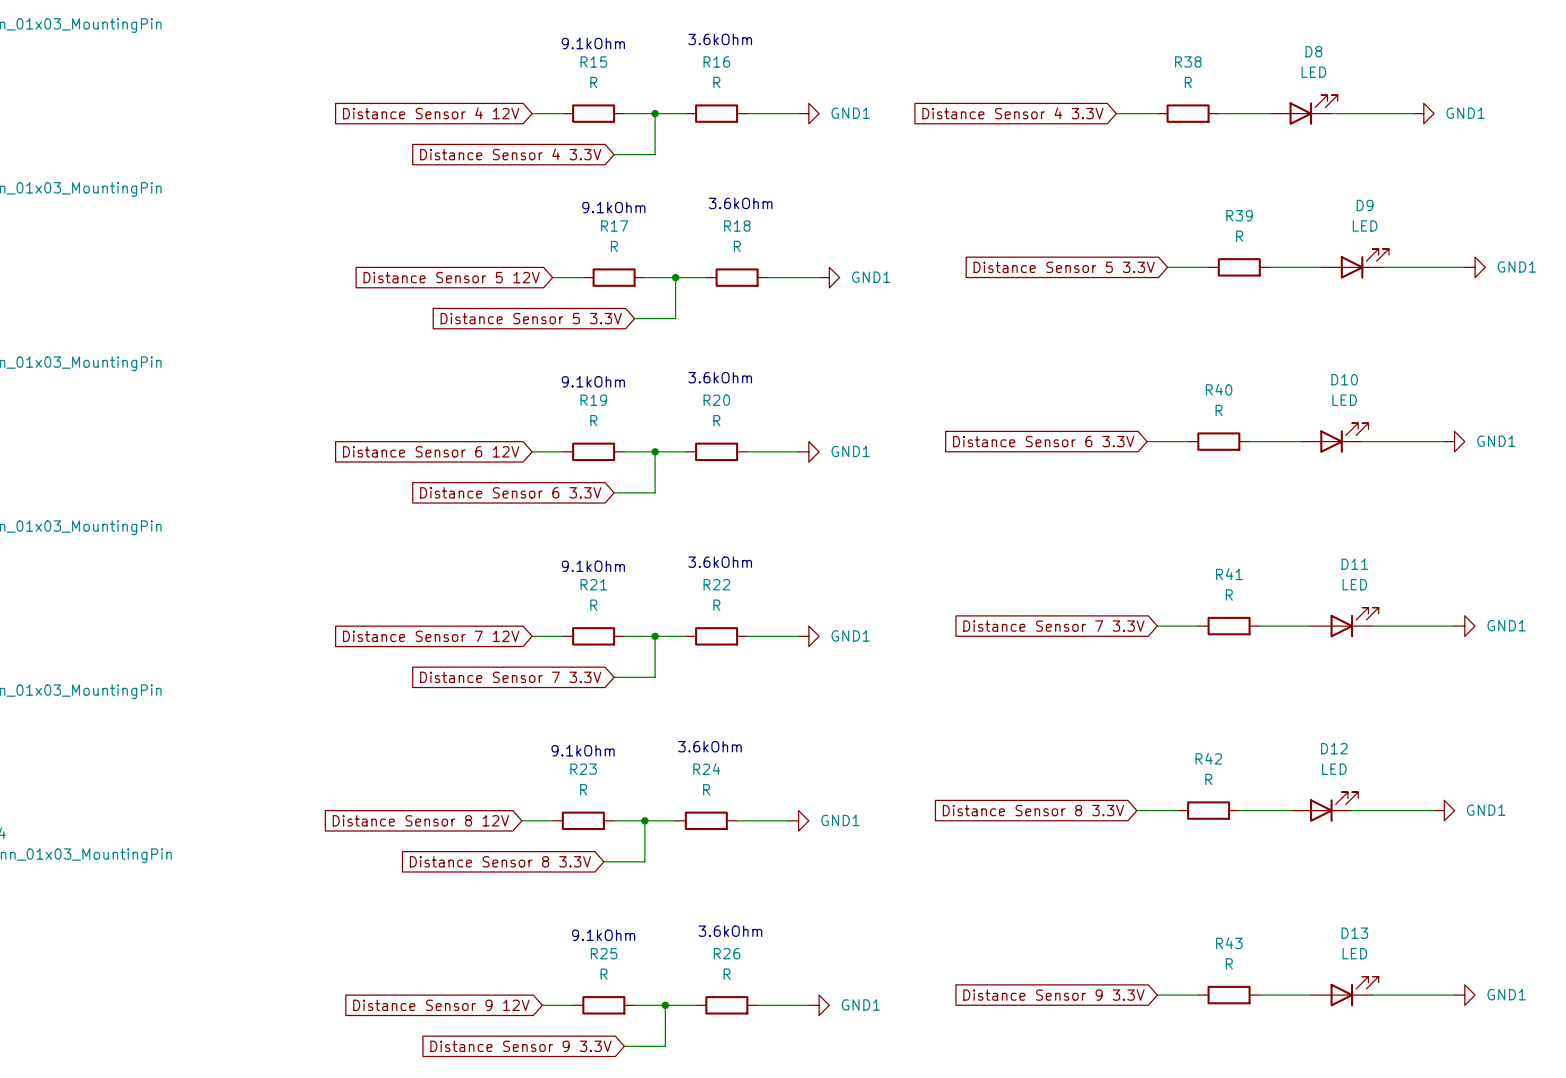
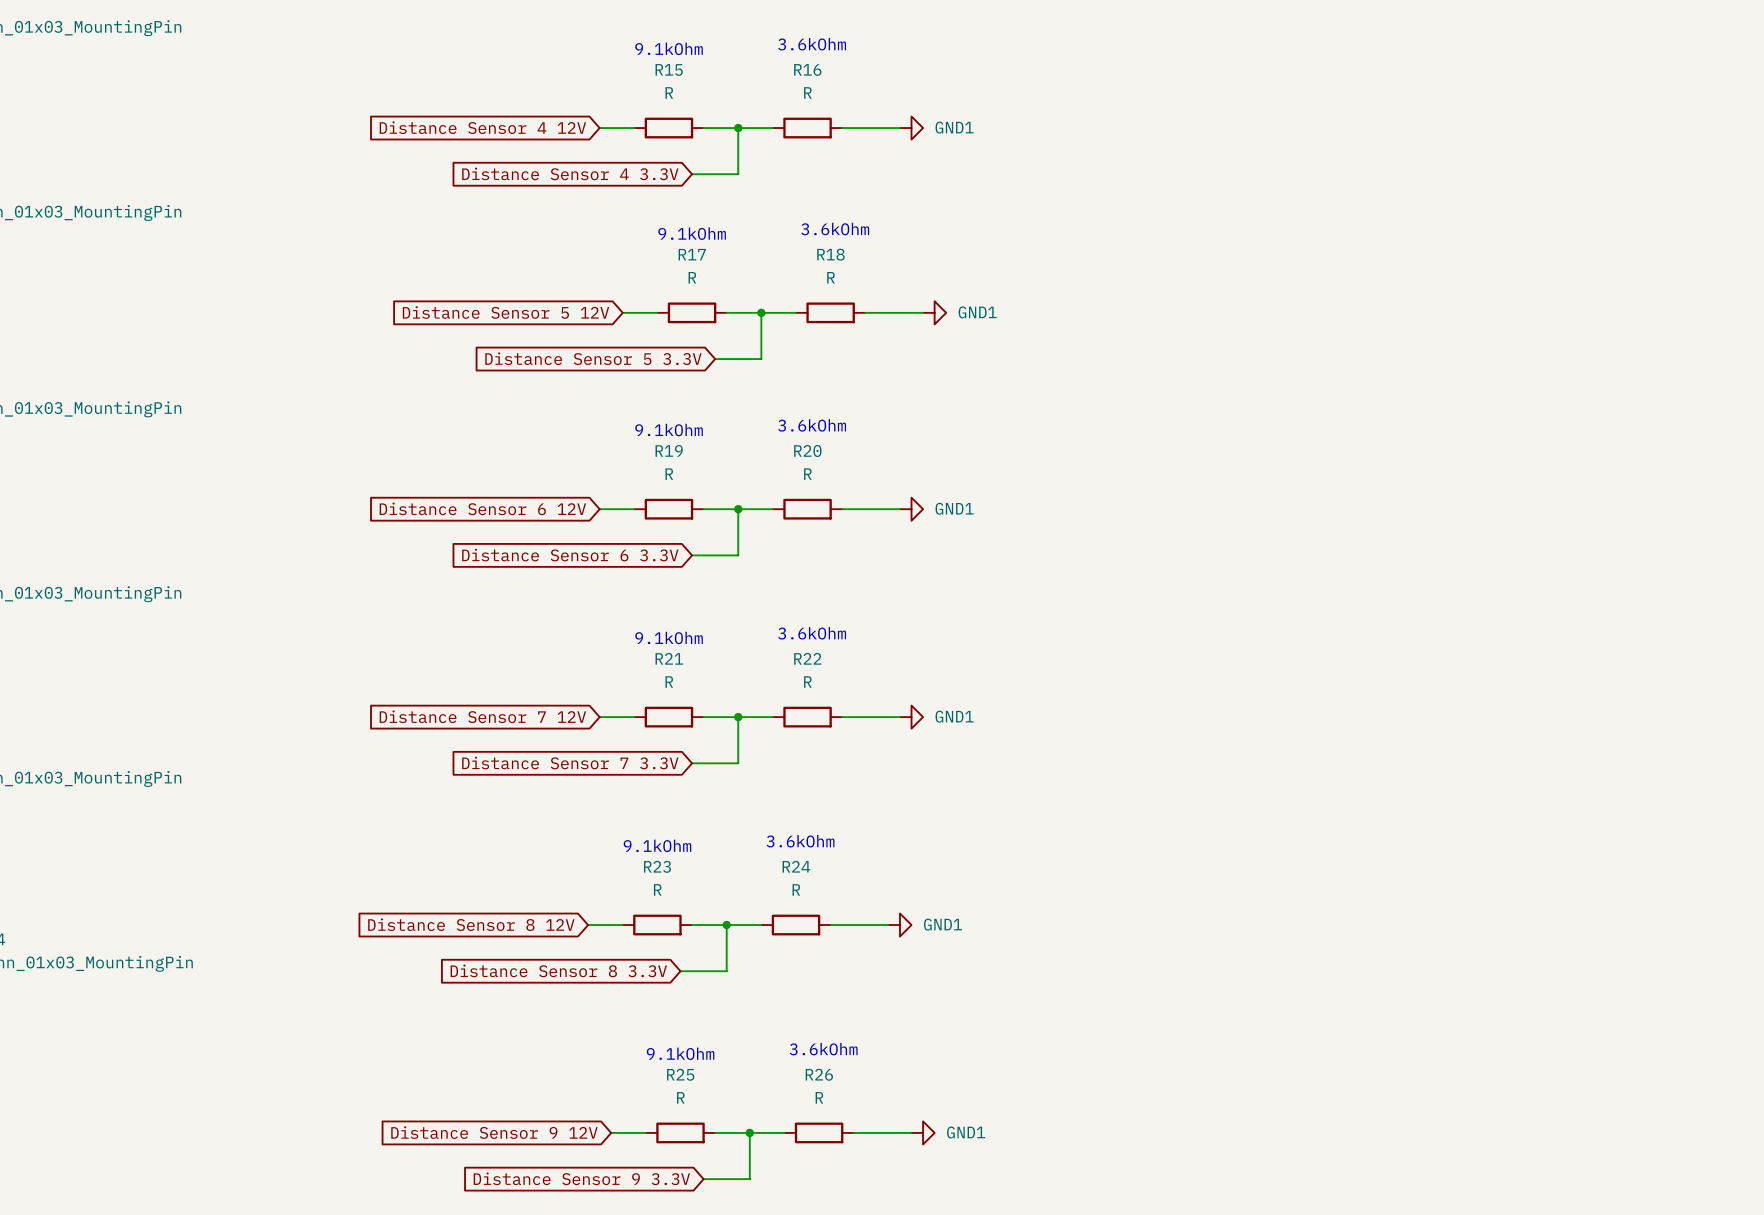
D8: LED (1303, 110) -> none
global label: Distance Sensor 4 3.3V (1012, 113) -> none
wire: (1116, 113) (1157, 113) -> none
R38: R (1188, 113) -> none
wire: (1218, 113) (1270, 113) -> none
wire: (1331, 113) (1413, 113) -> none
power symbol: GND1 (1423, 113) -> none
D9: LED (1355, 263) -> none
global label: Distance Sensor 5 3.3V (1064, 267) -> none
wire: (1167, 267) (1208, 267) -> none
R39: R (1239, 267) -> none
wire: (1270, 267) (1321, 267) -> none
wire: (1382, 267) (1464, 267) -> none
power symbol: GND1 (1475, 267) -> none
D10: LED (1334, 438) -> none
global label: Distance Sensor 6 3.3V (1043, 441) -> none
wire: (1147, 441) (1188, 441) -> none
R40: R (1218, 441) -> none
wire: (1249, 441) (1300, 441) -> none
wire: (1362, 441) (1444, 441) -> none
power symbol: GND1 (1454, 441) -> none
D11: LED (1344, 622) -> none
global label: Distance Sensor 7 3.3V (1053, 626) -> none
wire: (1157, 626) (1198, 626) -> none
R41: R (1229, 626) -> none
wire: (1259, 626) (1311, 626) -> none
wire: (1372, 626) (1454, 626) -> none
power symbol: GND1 (1464, 626) -> none
D12: LED (1324, 806) -> none
global label: Distance Sensor 8 3.3V (1033, 810) -> none
wire: (1136, 810) (1177, 810) -> none
R42: R (1208, 810) -> none
wire: (1239, 810) (1290, 810) -> none
wire: (1352, 810) (1434, 810) -> none
power symbol: GND1 (1444, 810) -> none
D13: LED (1344, 991) -> none
global label: Distance Sensor 9 3.3V (1053, 995) -> none
wire: (1157, 995) (1198, 995) -> none
R43: R (1229, 995) -> none
wire: (1259, 995) (1311, 995) -> none
wire: (1372, 995) (1454, 995) -> none
power symbol: GND1 (1464, 995) -> none

